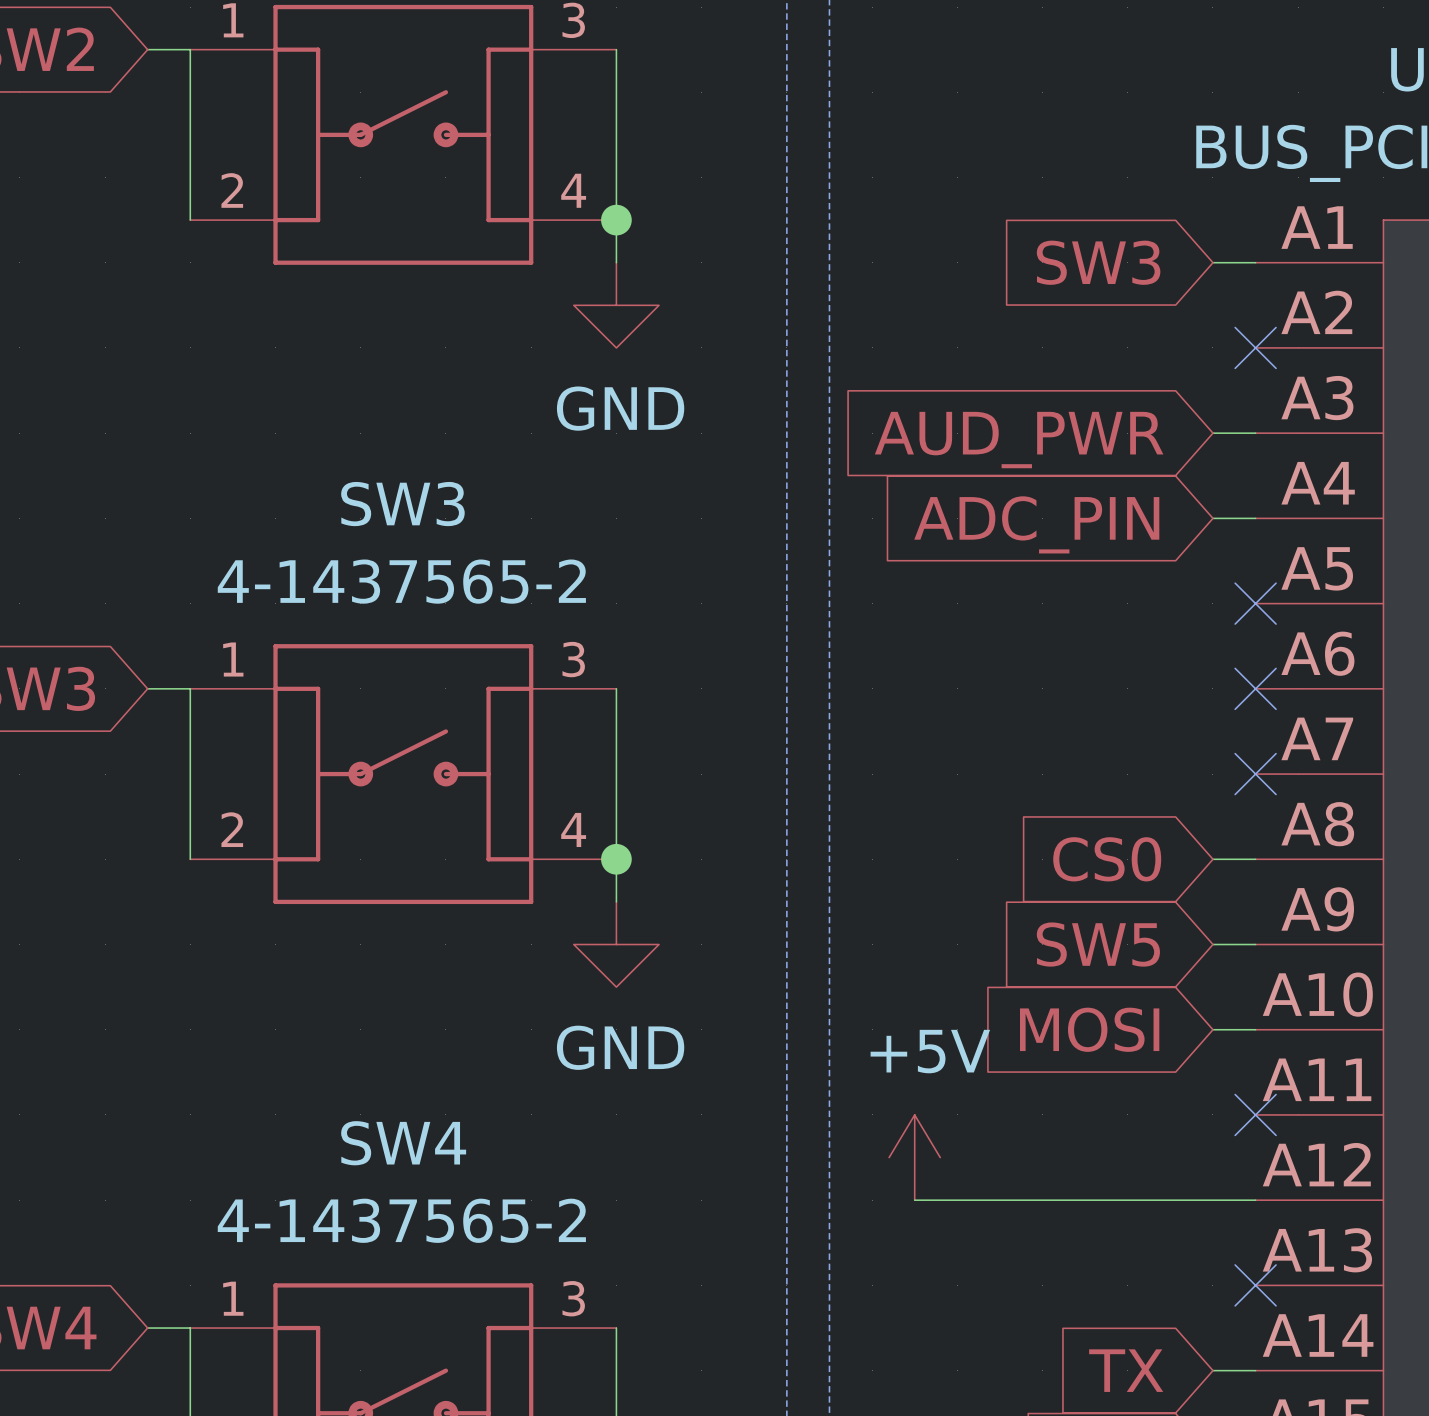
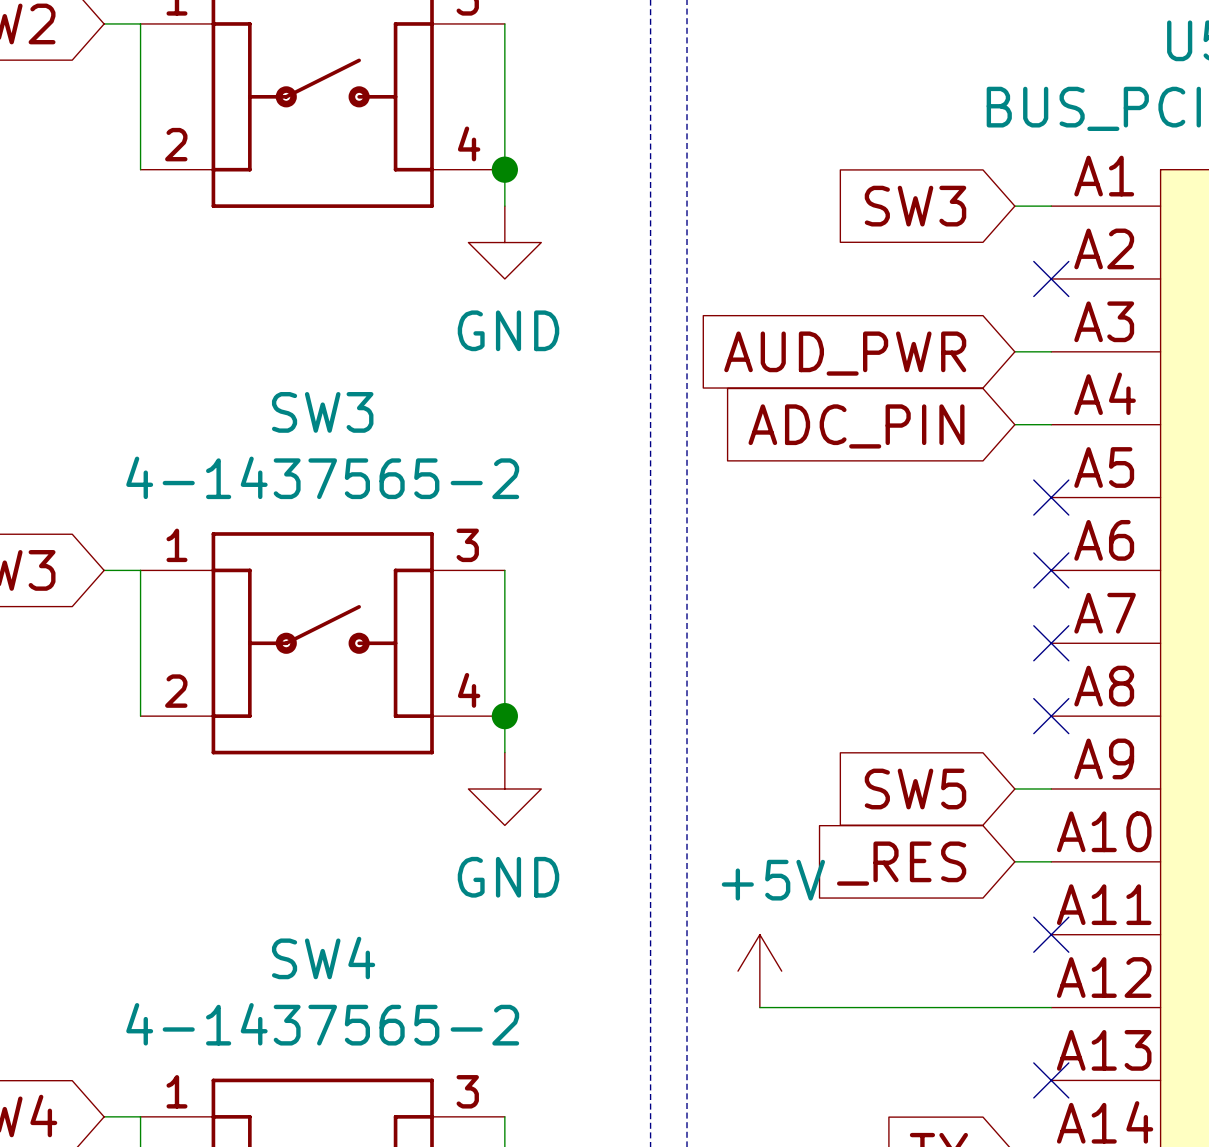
global label: CS0 (1107, 859) -> none
wire: (1212, 859) (1255, 859) -> none
no-connect mark: none -> (1051, 716)
global label: MOSI (1089, 1029) -> _RES (901, 863)

